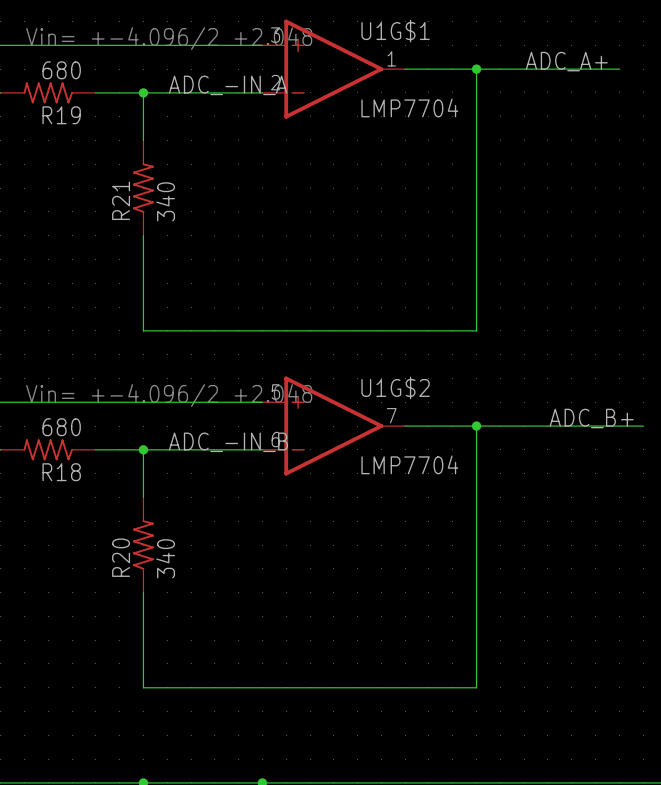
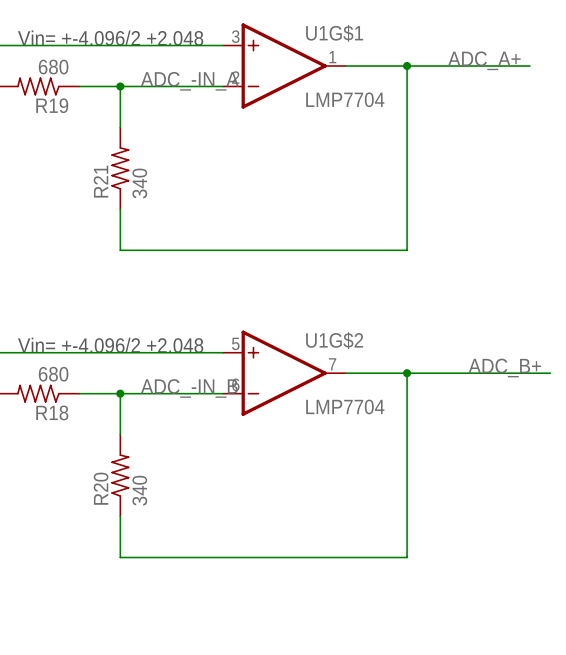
wire: (143, 283) (143, 330) (476, 330) (476, 283) -> (120, 250) (407, 250)
wire: (143, 640) (143, 687) (476, 687) (476, 640) -> (120, 557) (407, 557)

